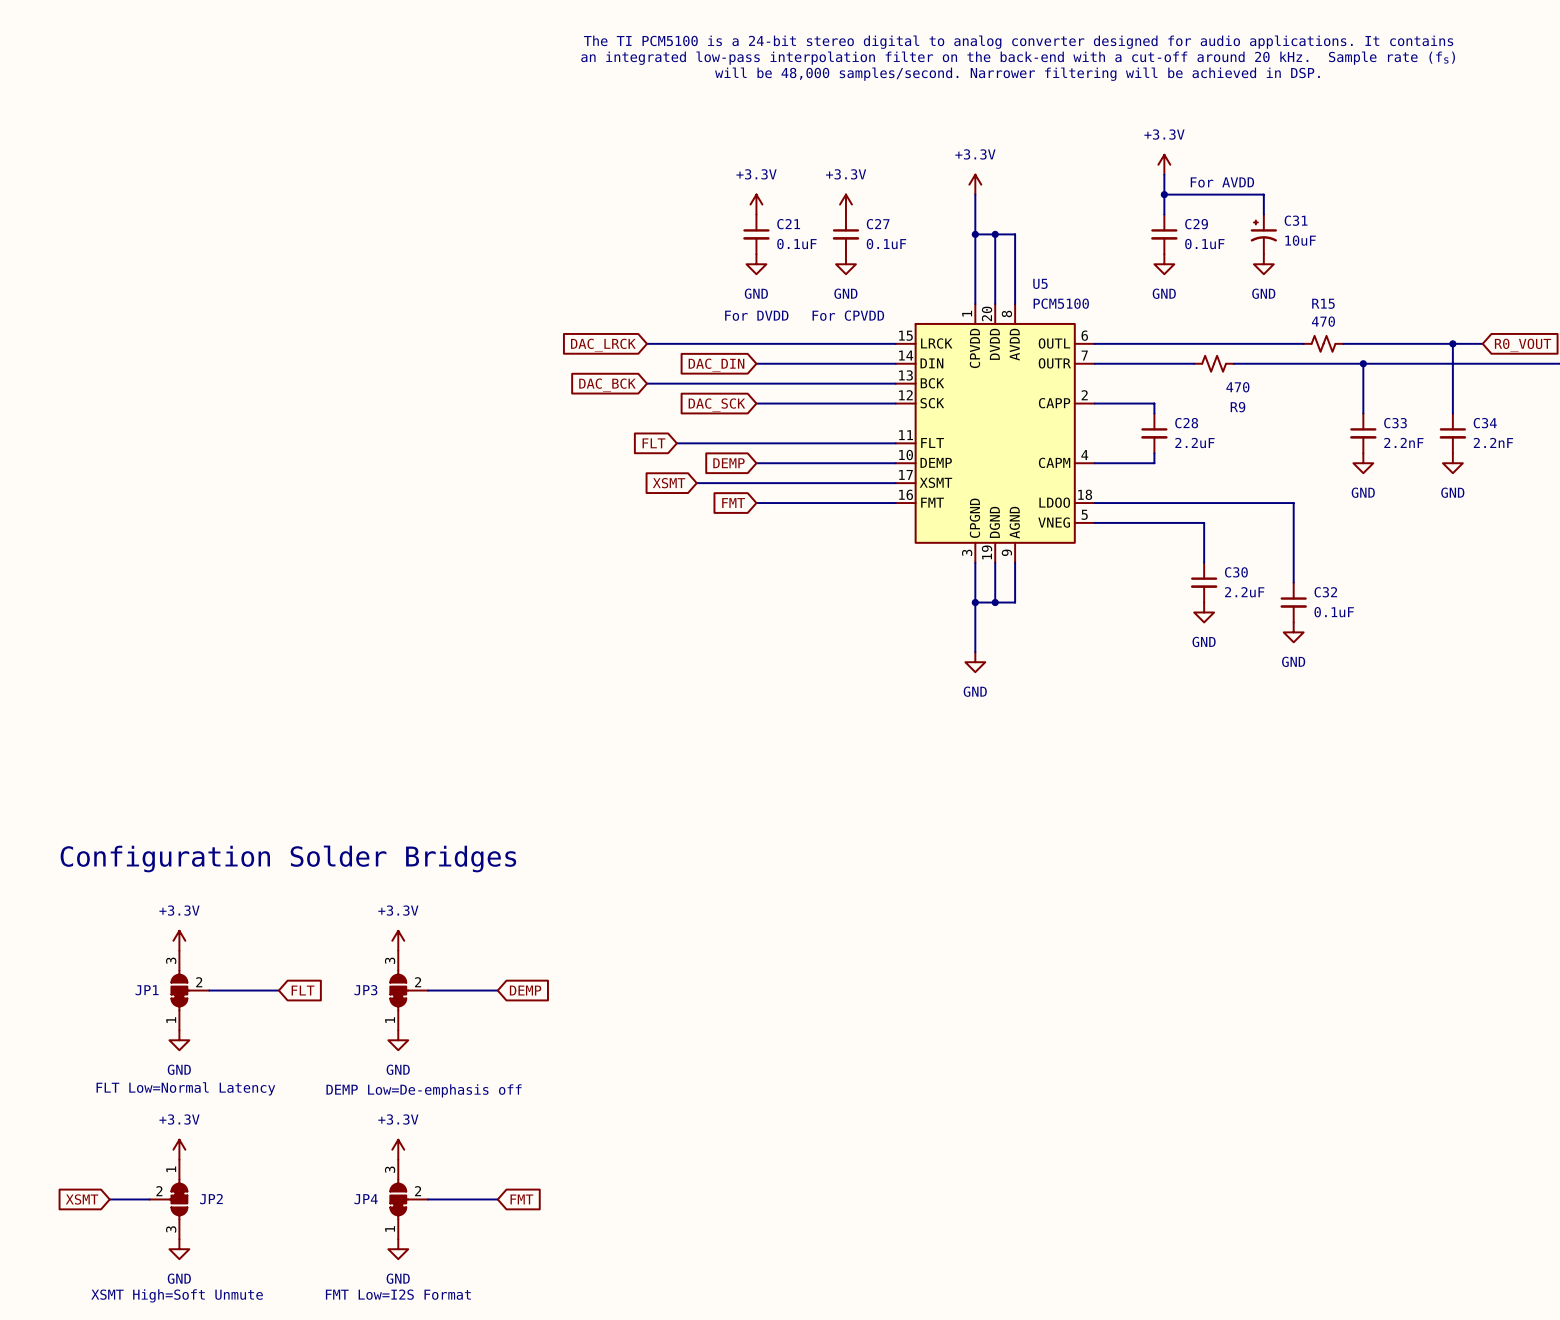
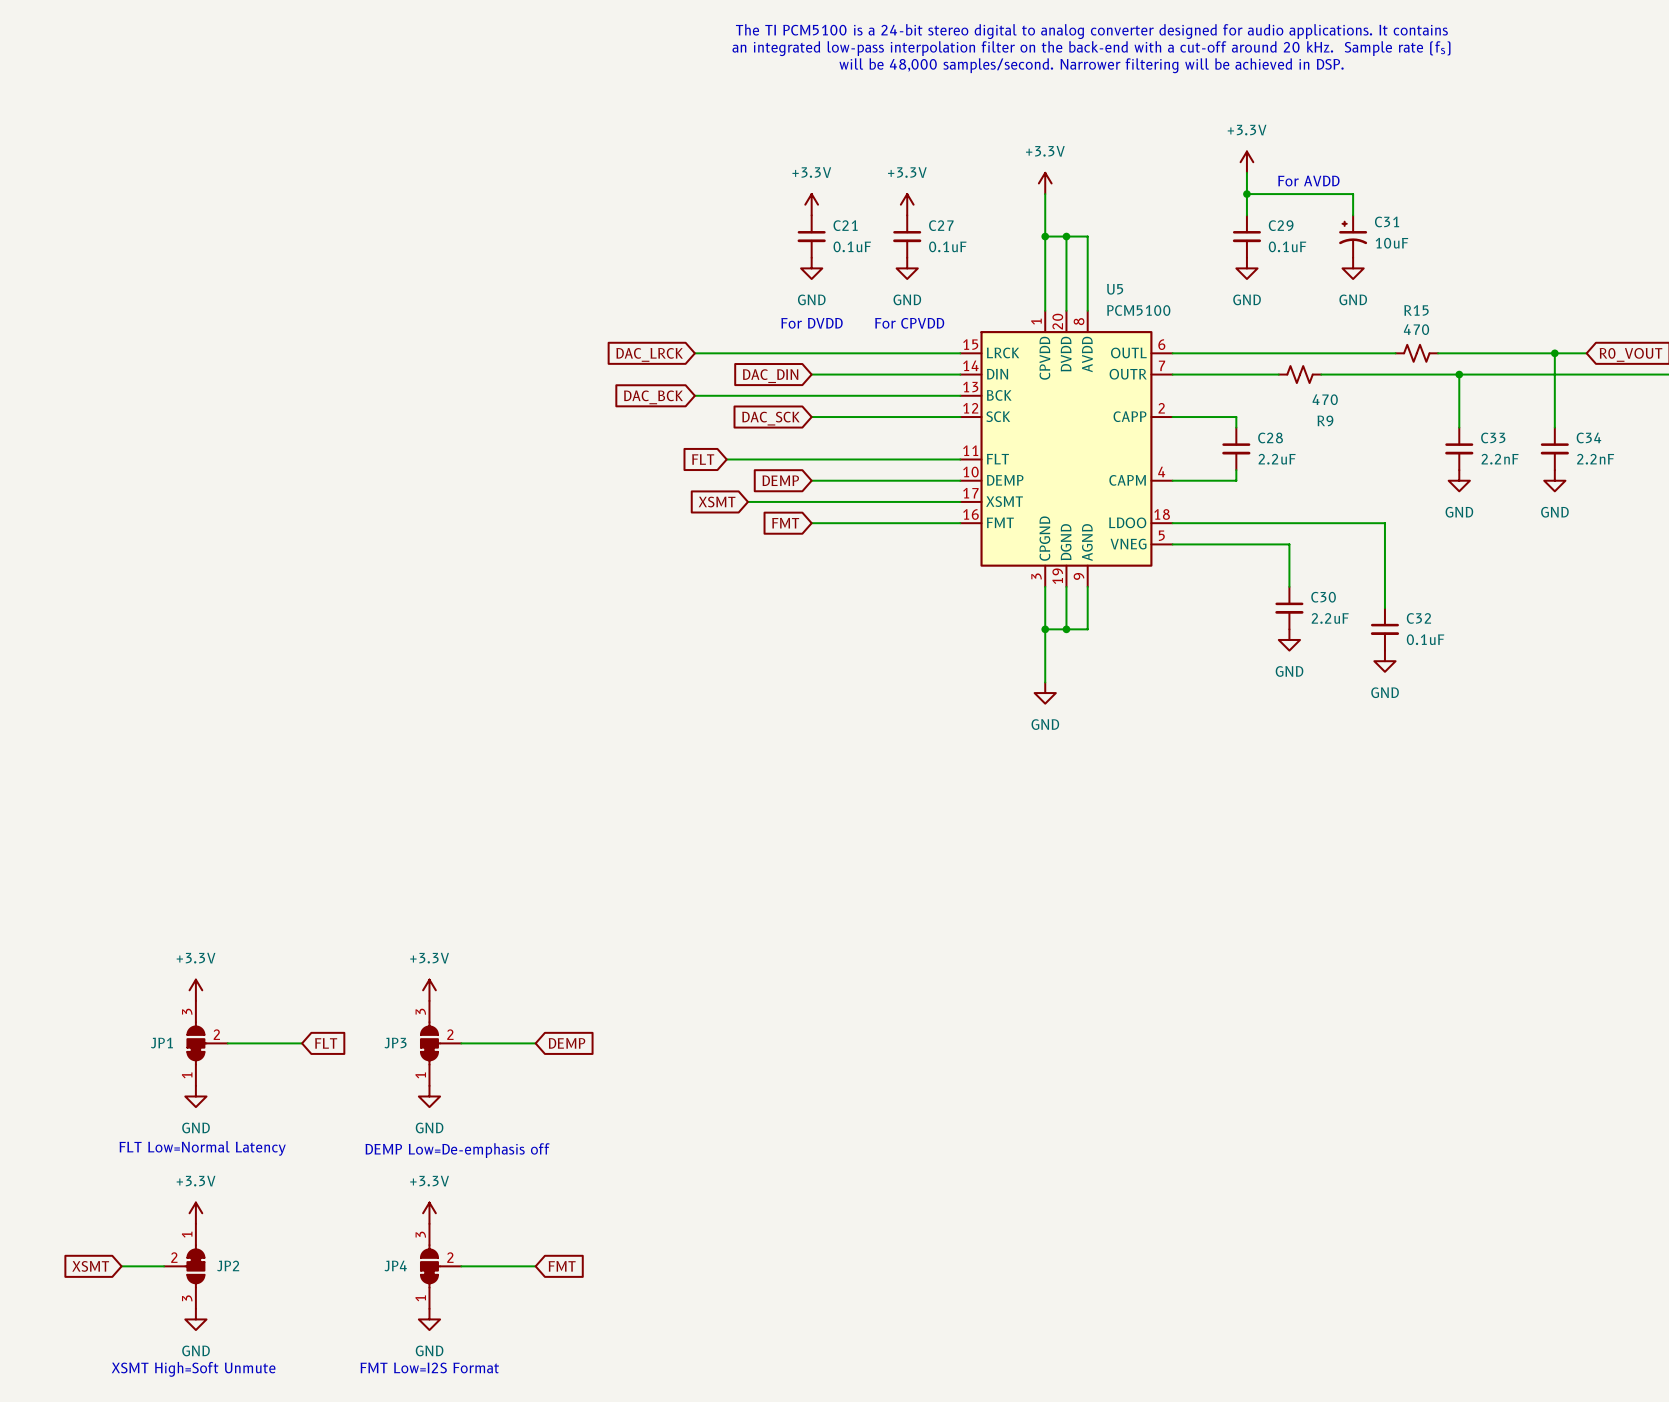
text: Configuration Solder Bridges (288, 858) -> none

